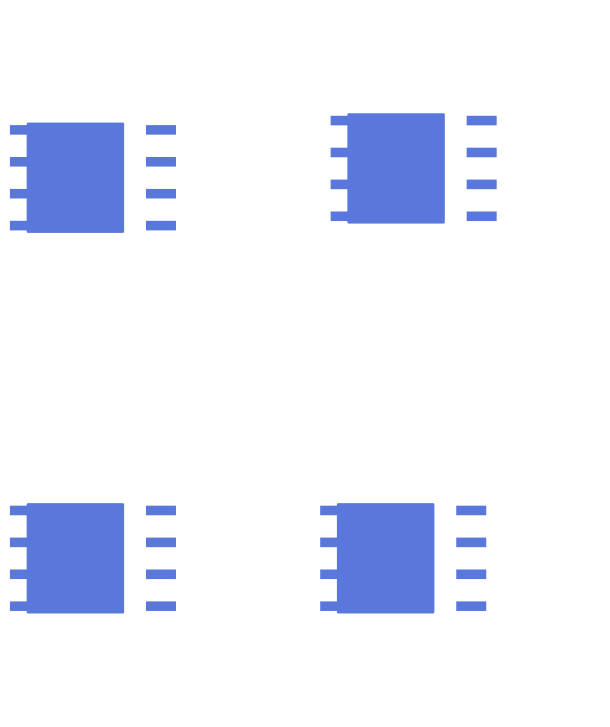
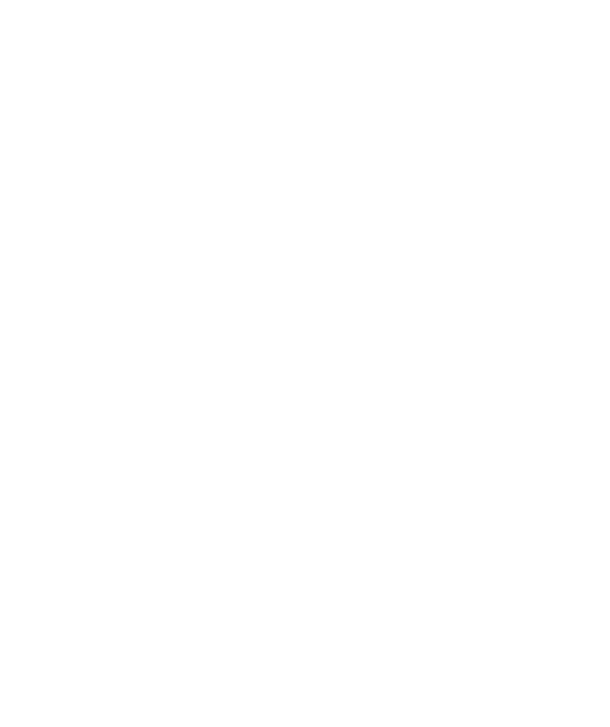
part: (413, 168) -> none
part: (92, 177) -> none
part: (92, 558) -> none
part: (403, 558) -> none

